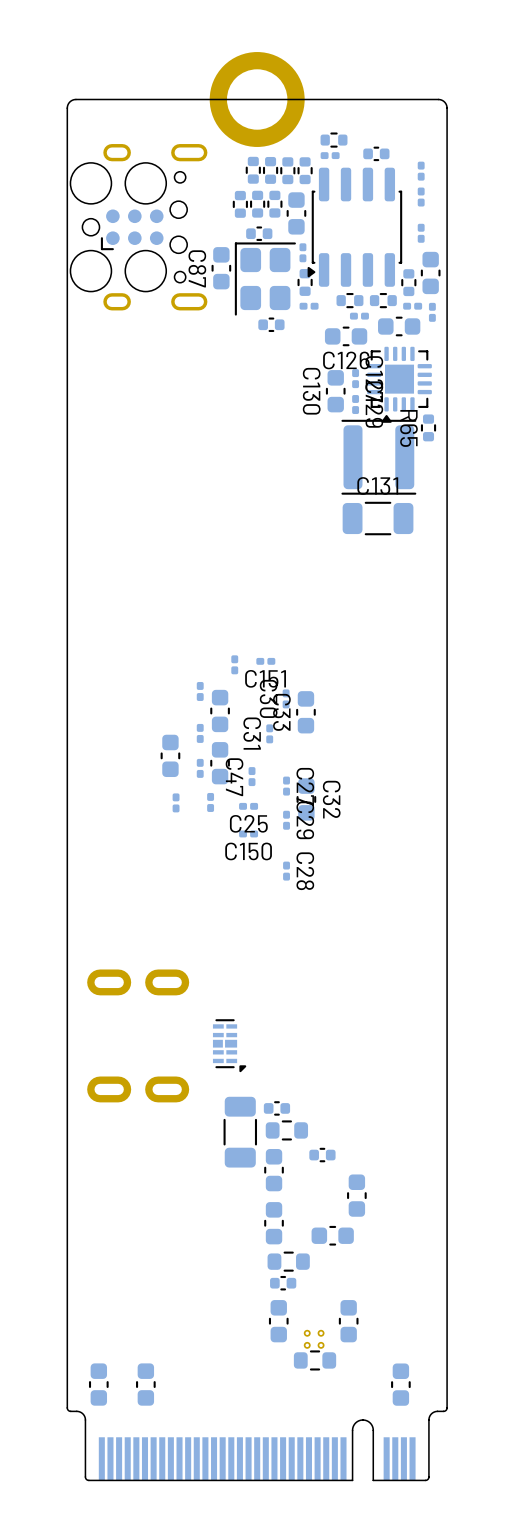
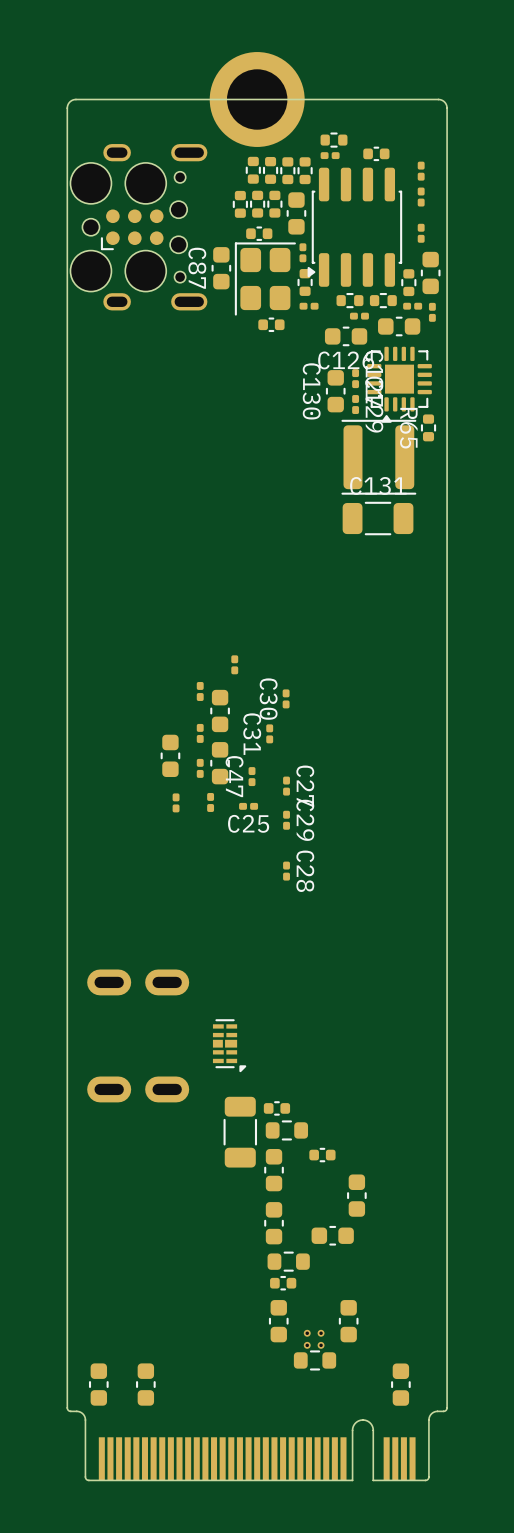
C151: (265, 661) -> none
C33: (305, 712) -> none
C32: (306, 799) -> none
C150: (248, 833) -> none

